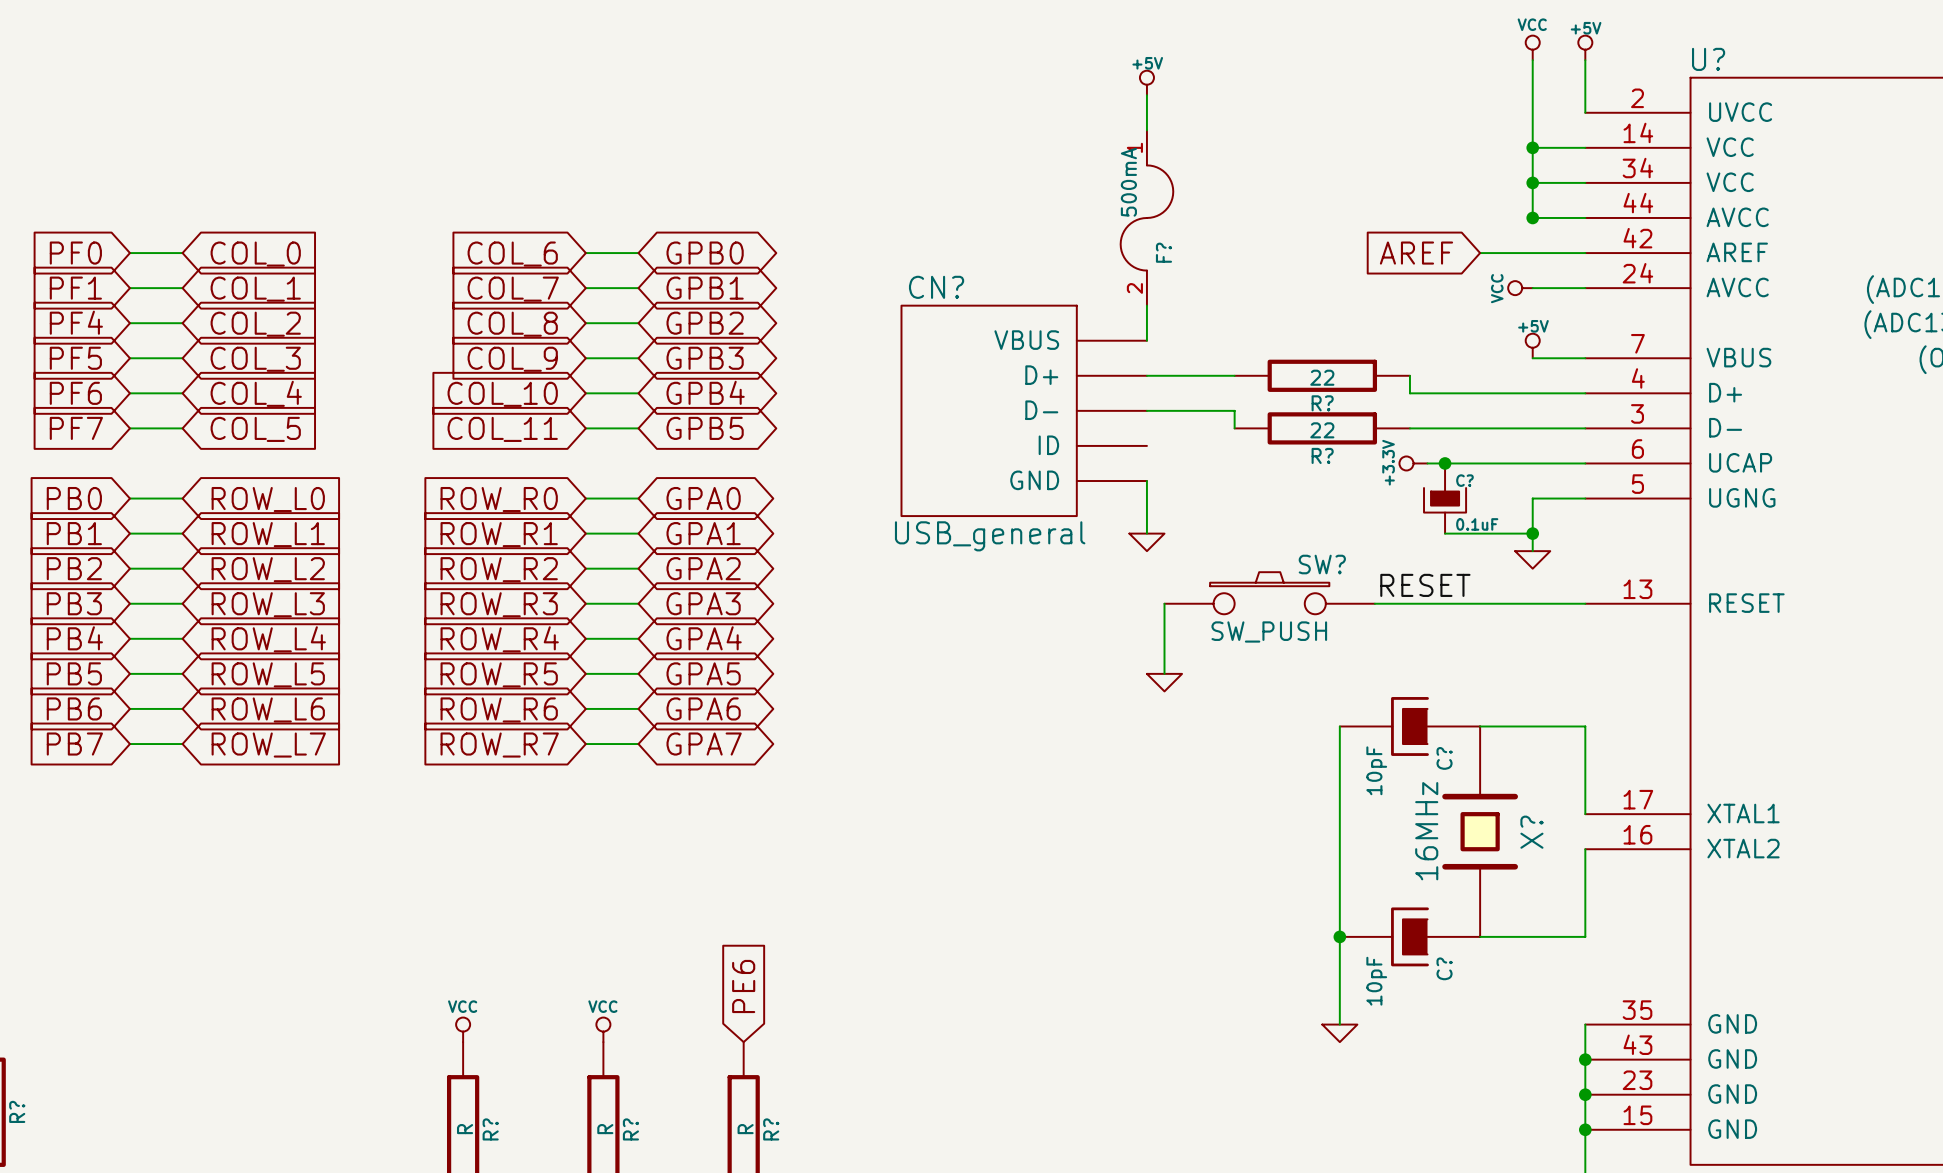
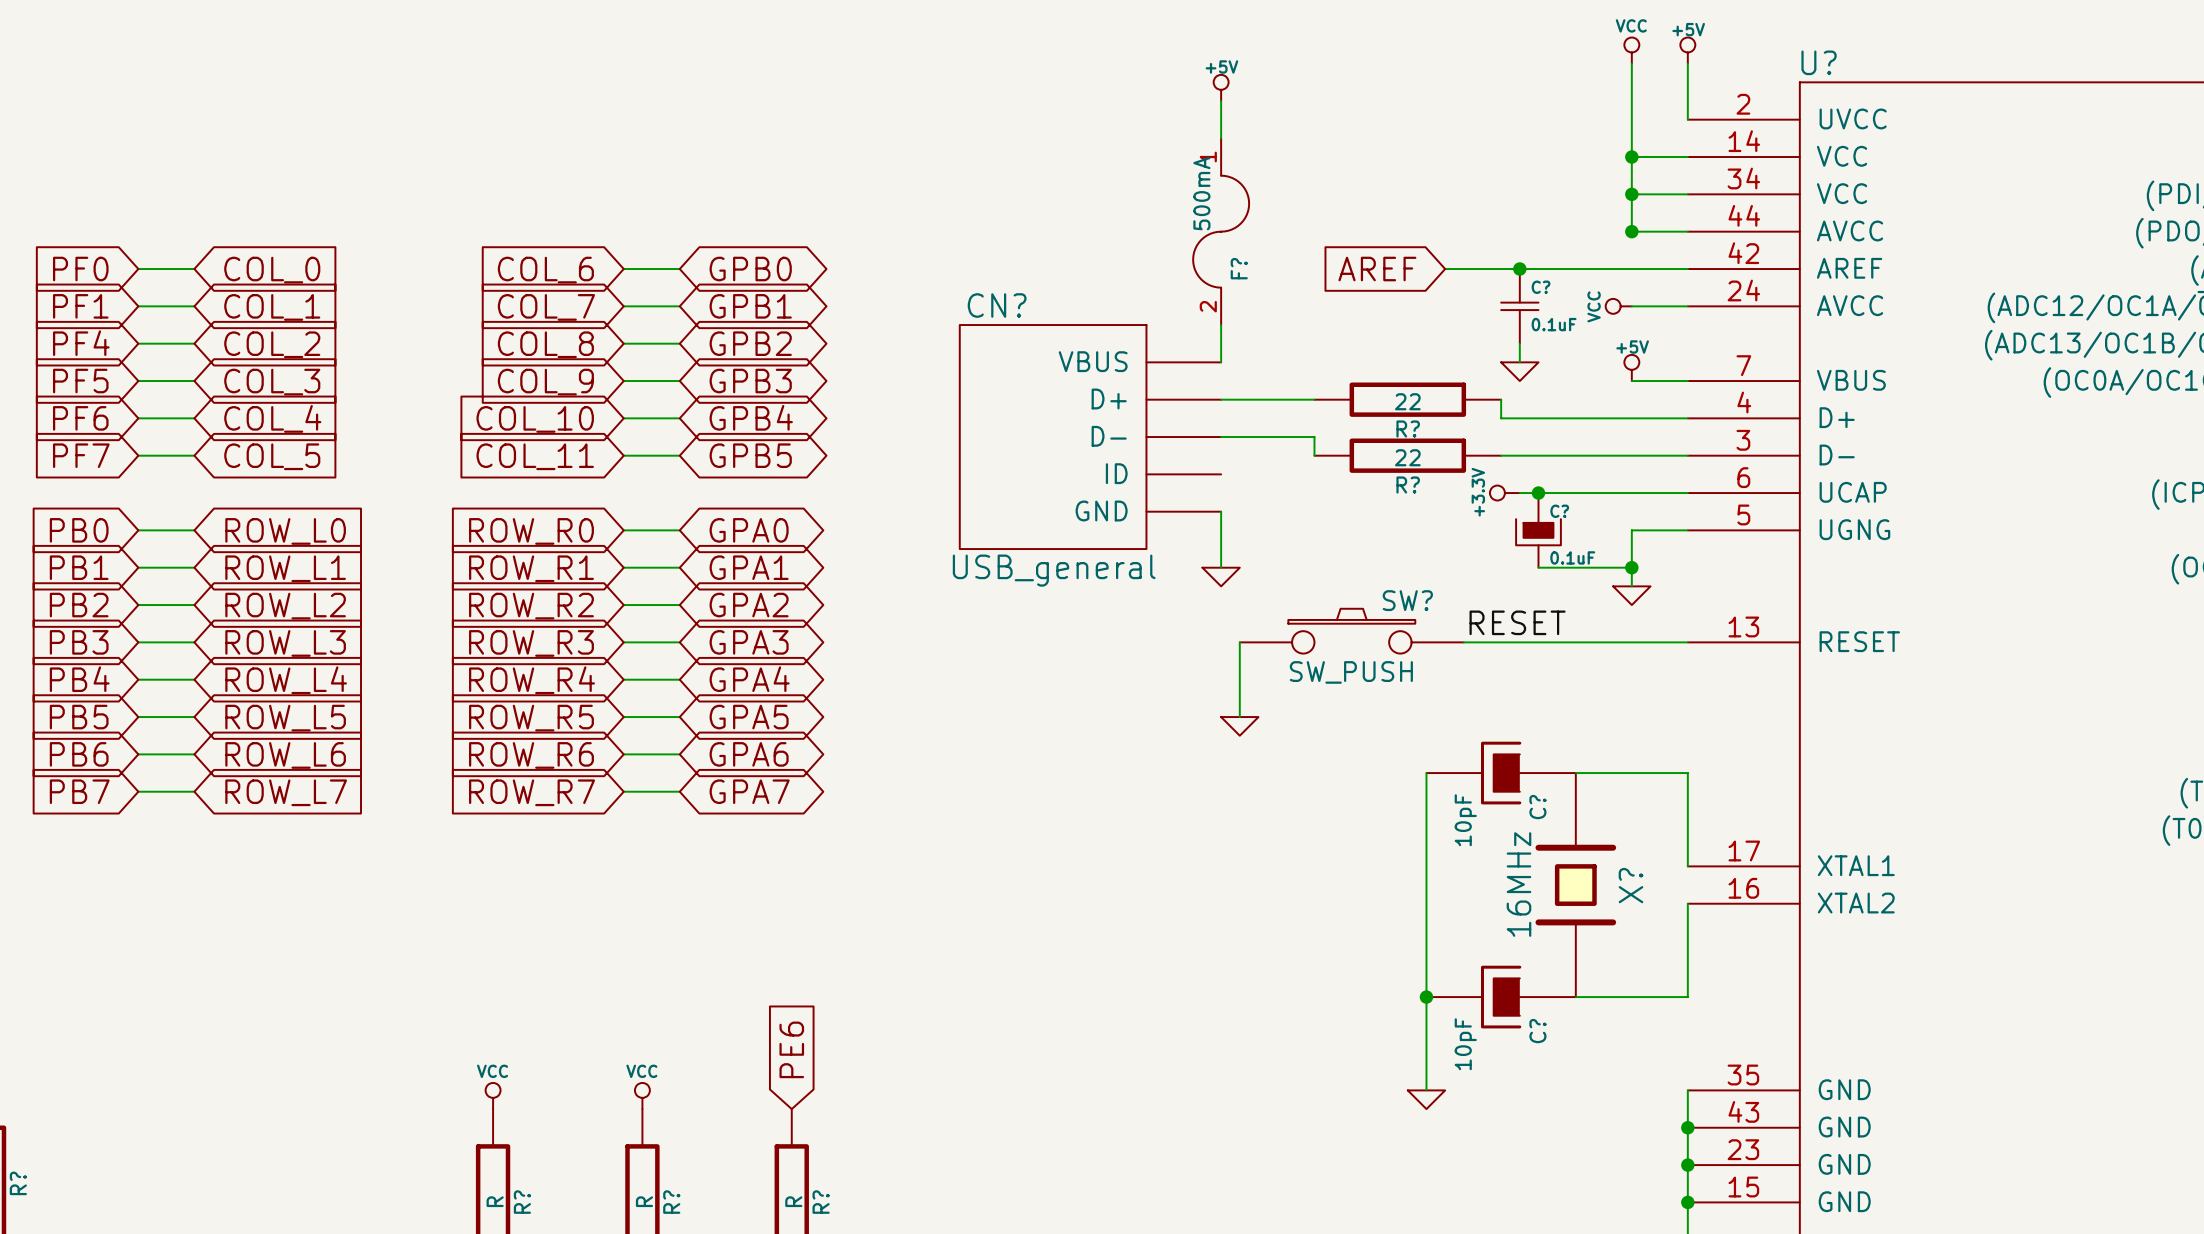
wire: none -> (1445, 269) (1575, 269)
global label position: AREF (1416, 253) -> AREF (1377, 269)
junction: none -> (1519, 269)
C?: none -> 0.1uF (1519, 306)
wire: none -> (1519, 343) (1519, 362)
power symbol: none -> (1519, 371)

